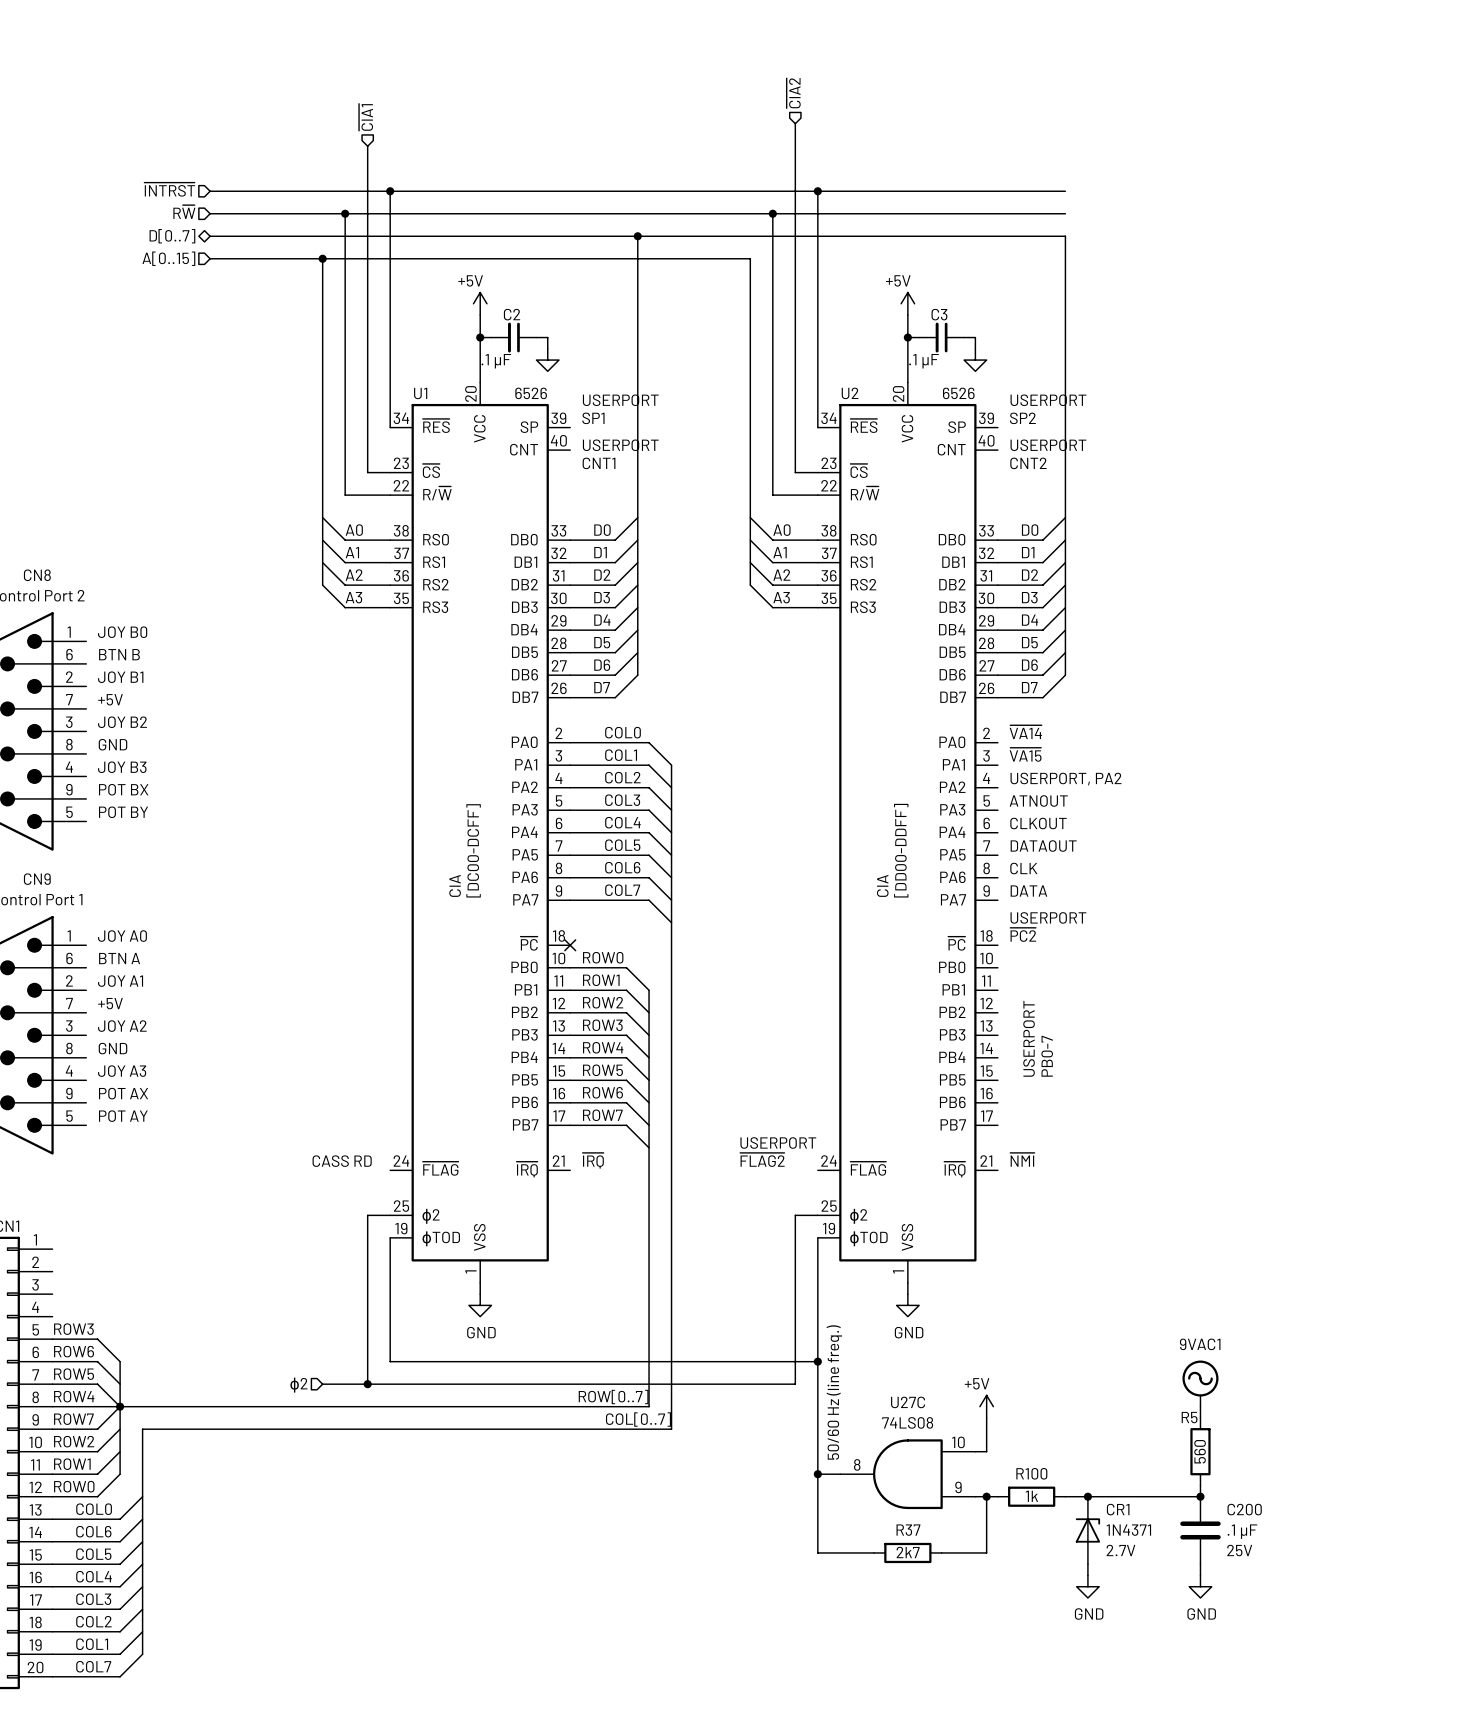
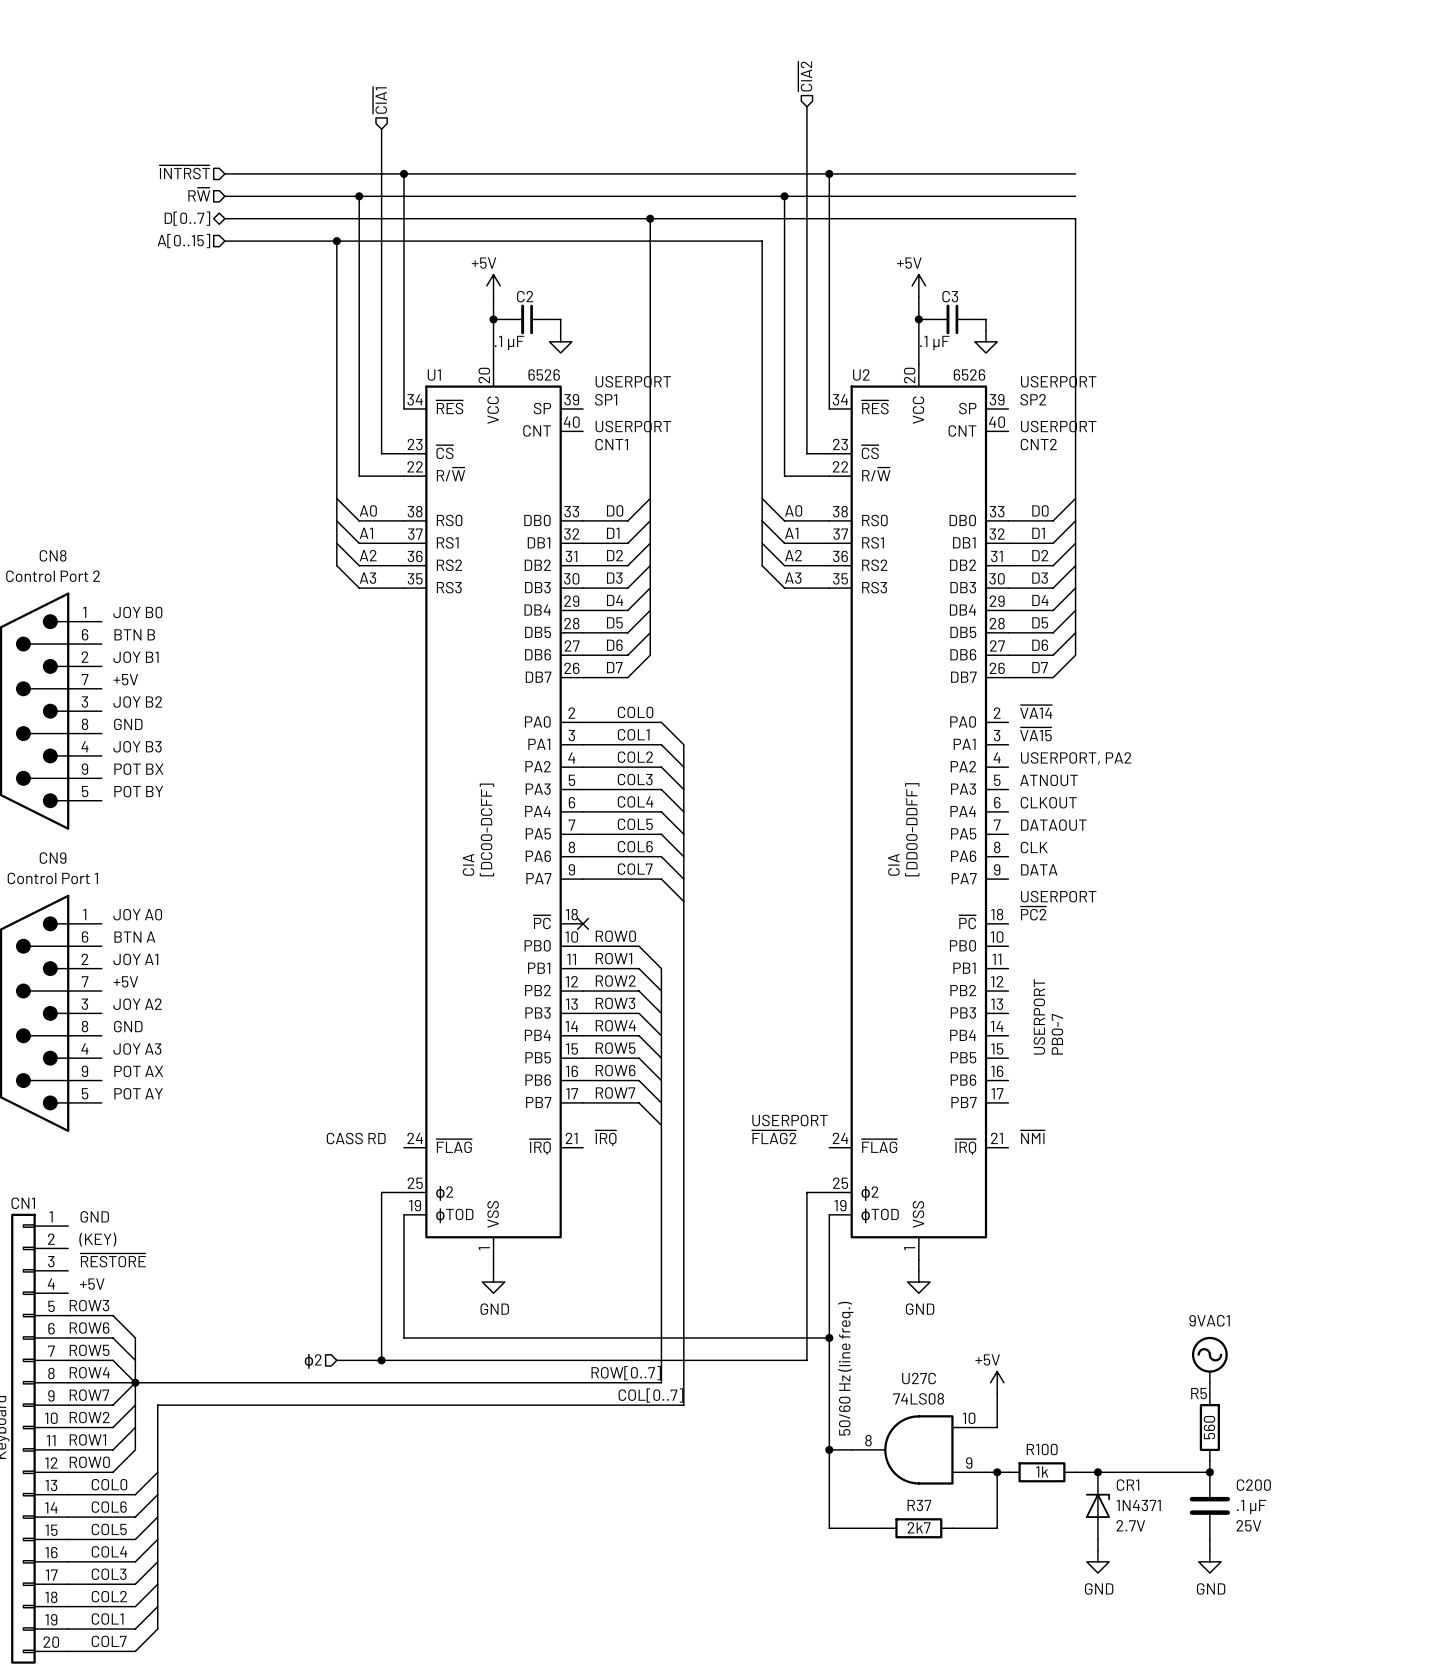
text: none -> GND (94, 1216)
text: none -> (KEY) (97, 1239)
text: none -> ~{RESTORE} (113, 1260)
text: none -> +5V (92, 1284)

